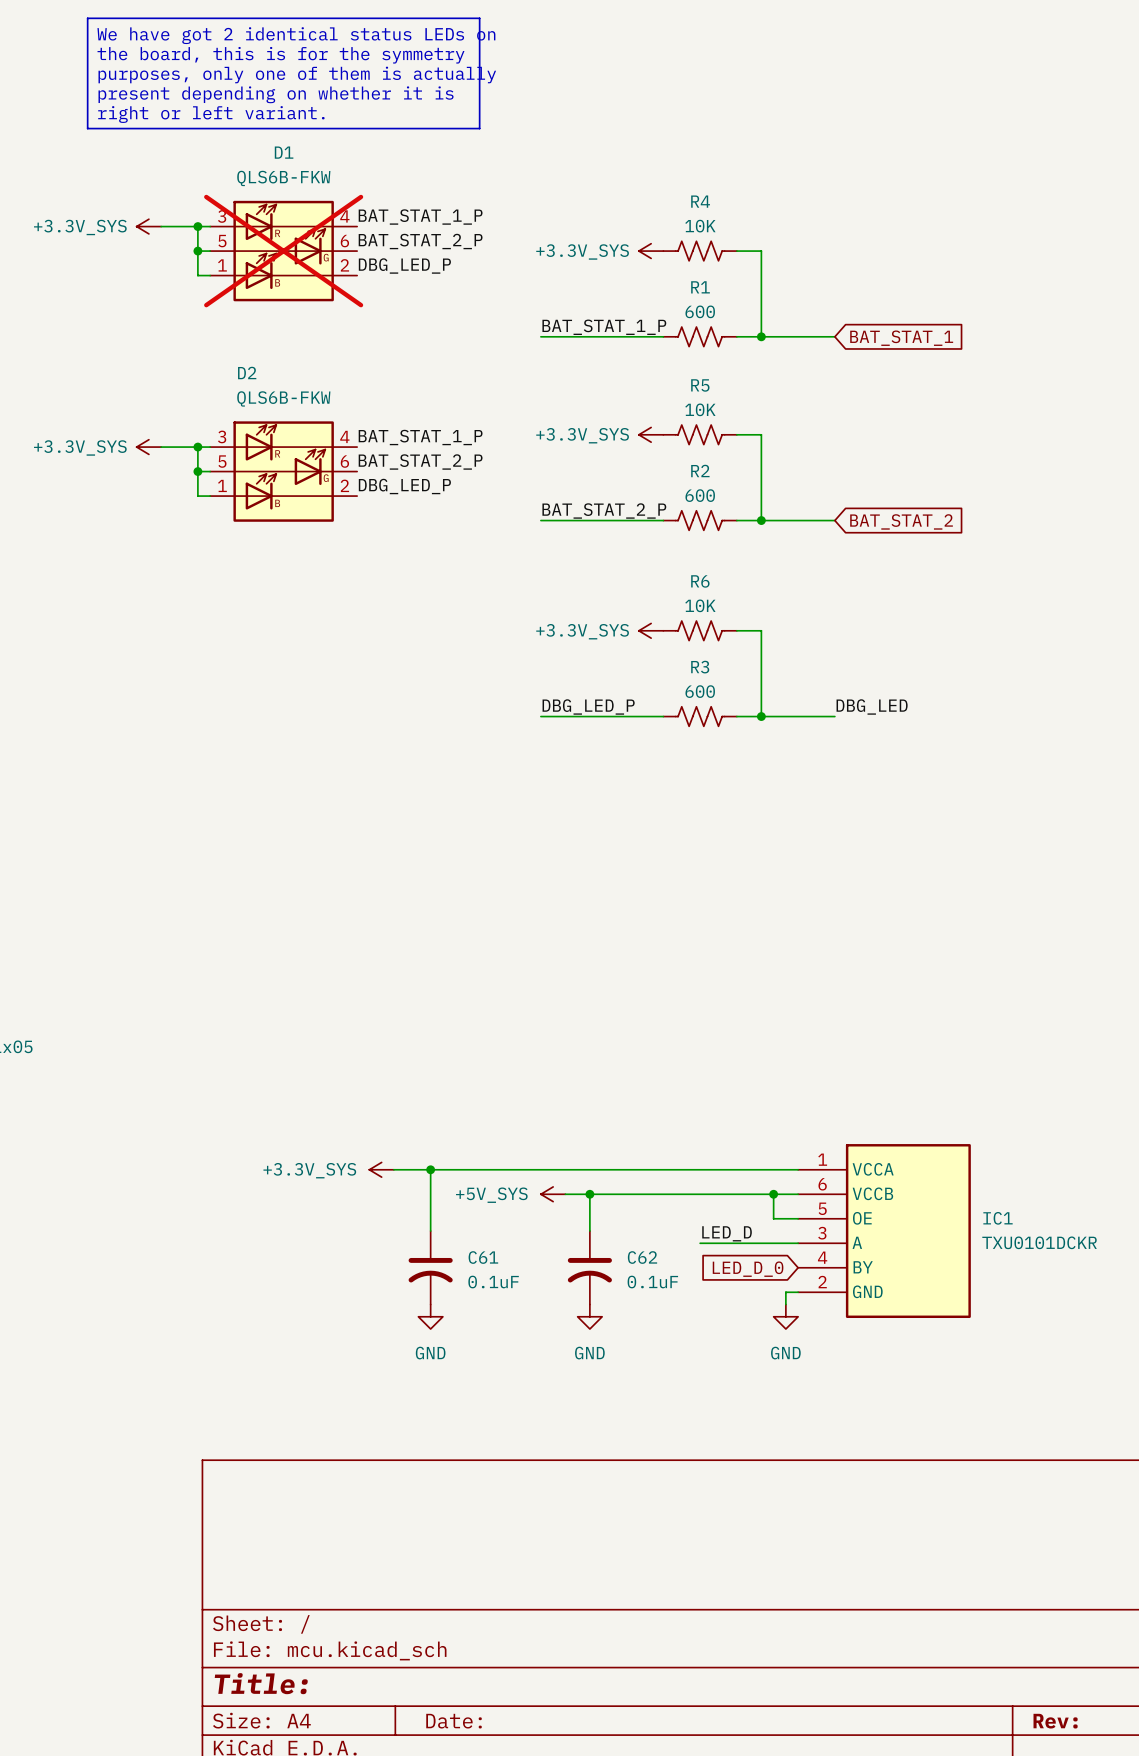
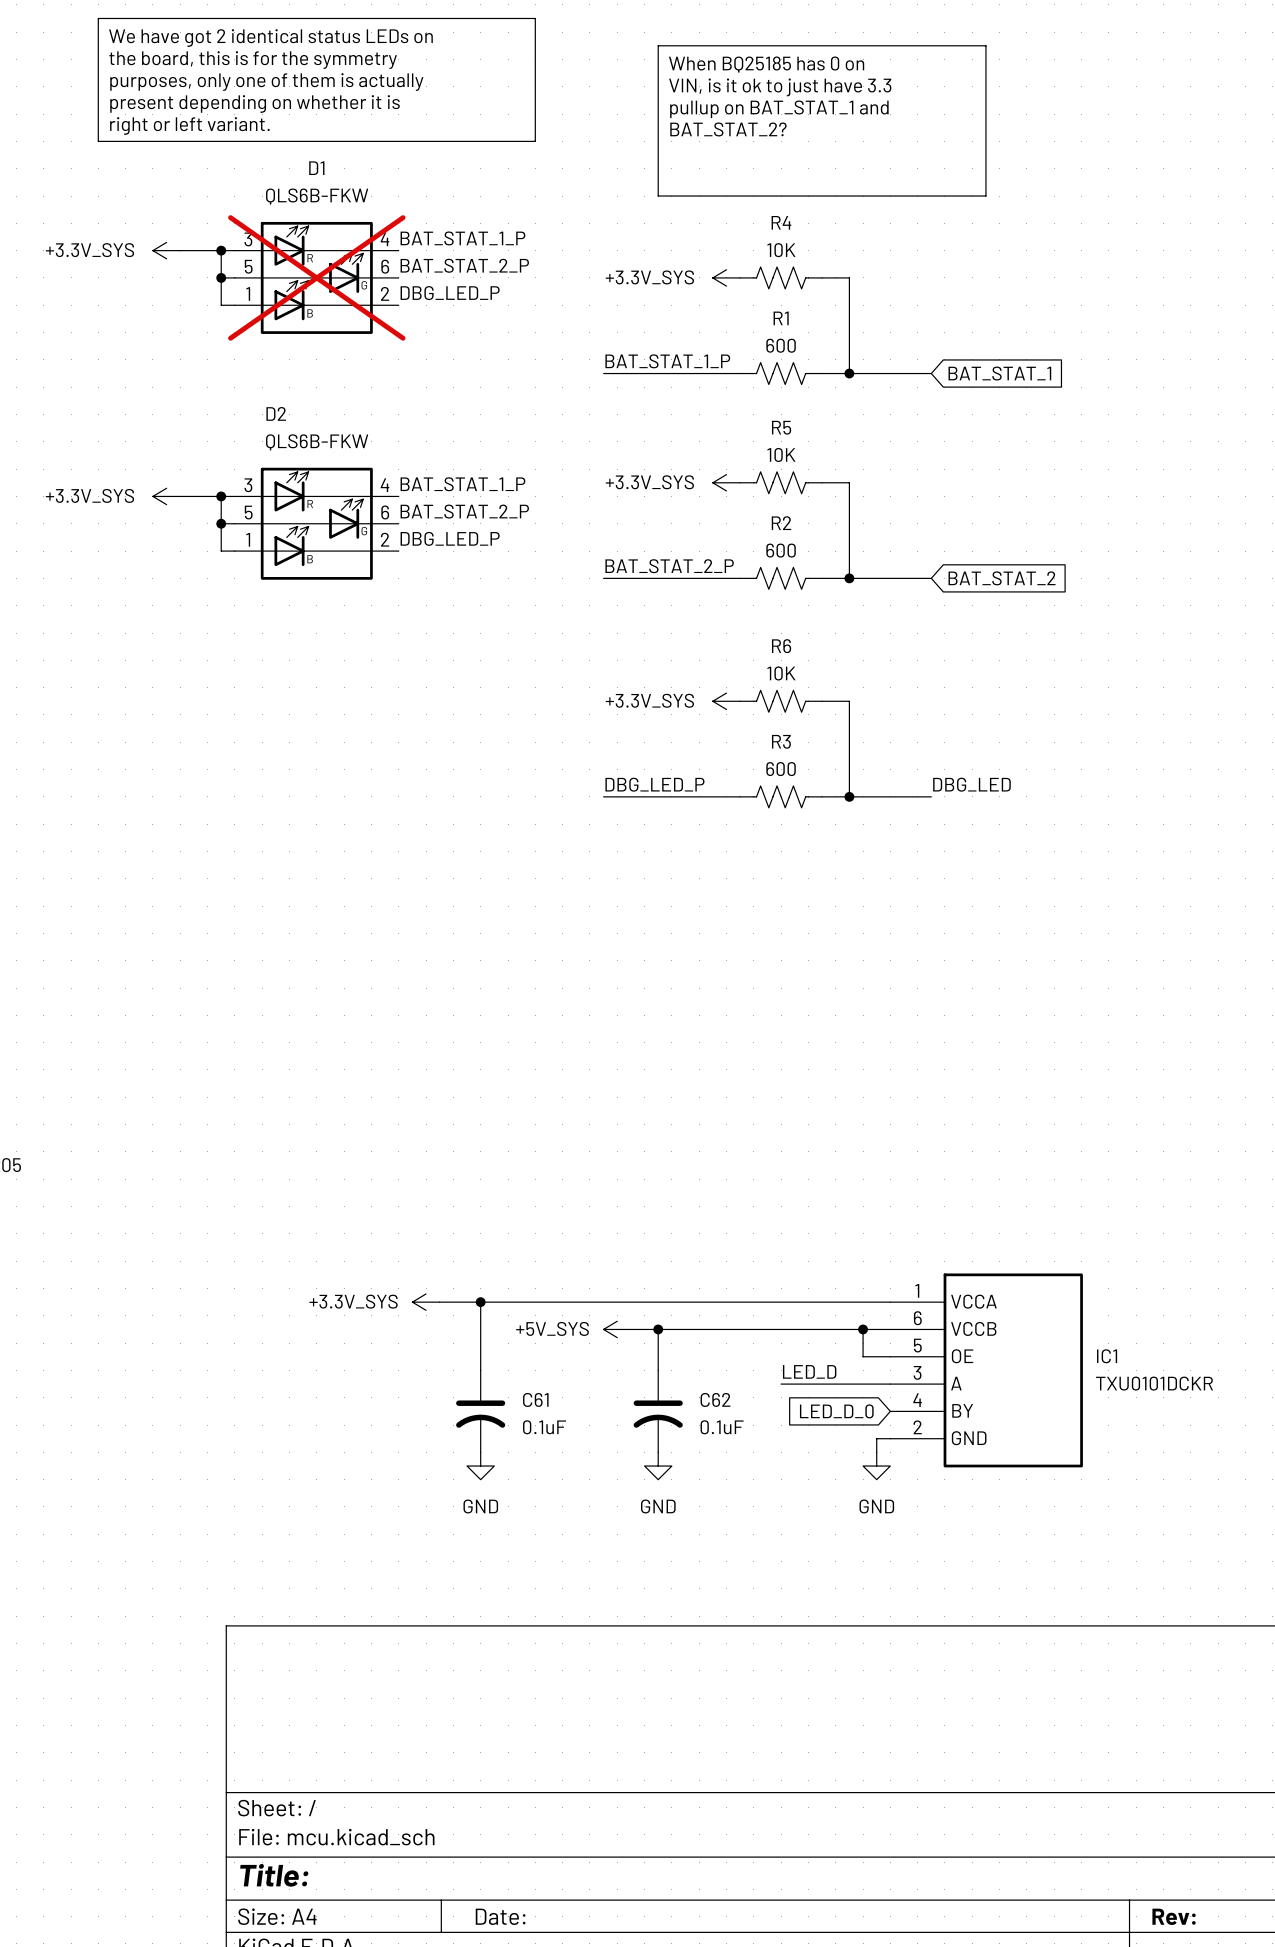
line: none -> (658, 45) (985, 45) (985, 196) (658, 196) (658, 45)
text: none -> When BQ25185 has 0 on (766, 64)
text: none -> VIN, is it ok to just have 3.3 (780, 87)
text: none -> pullup on BAT_STAT_1 and (779, 109)
text: none -> BAT_STAT_2? (728, 129)

